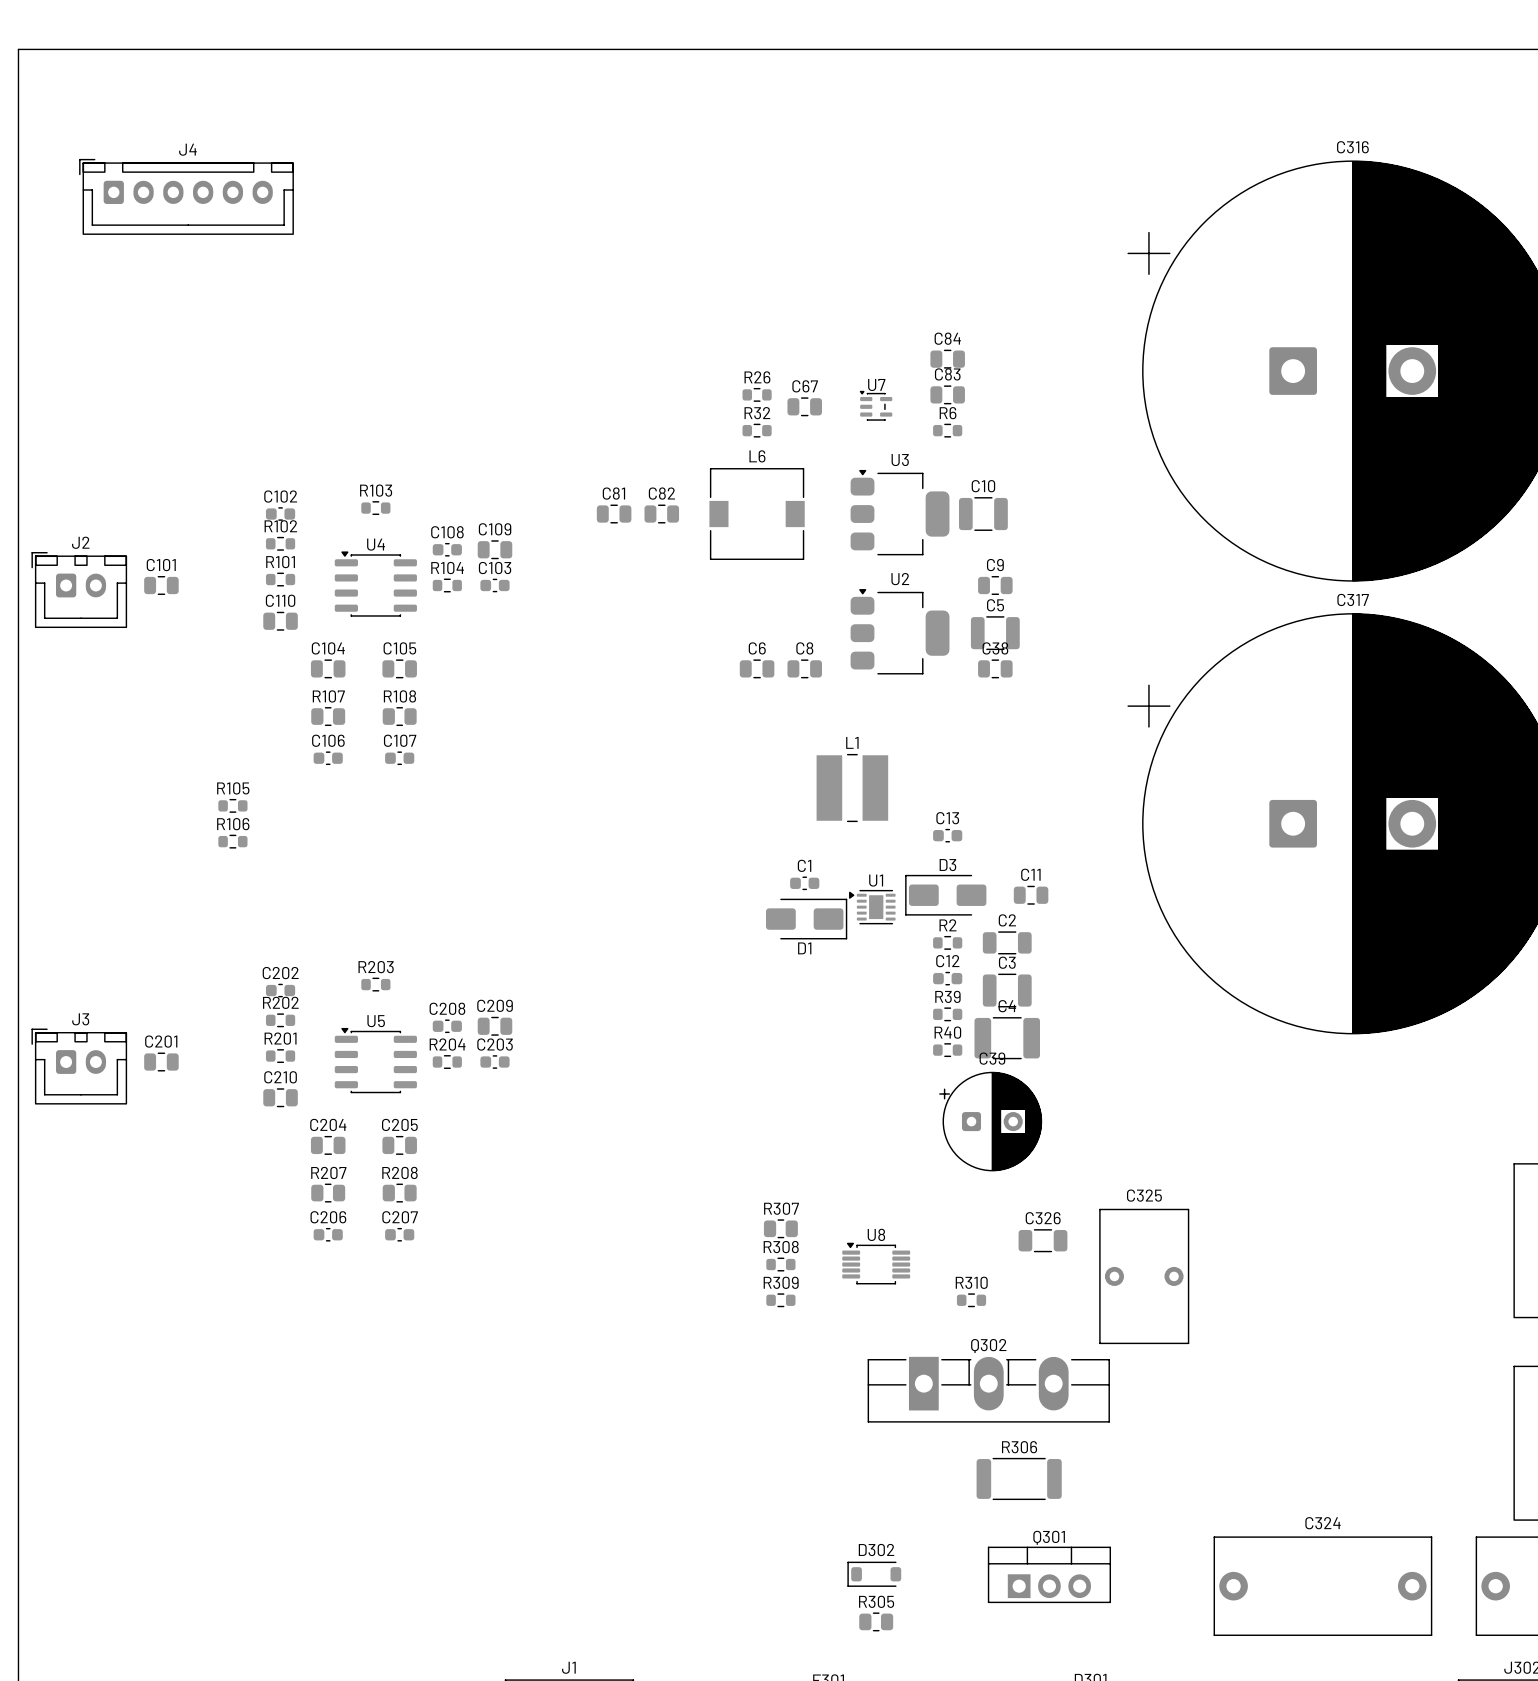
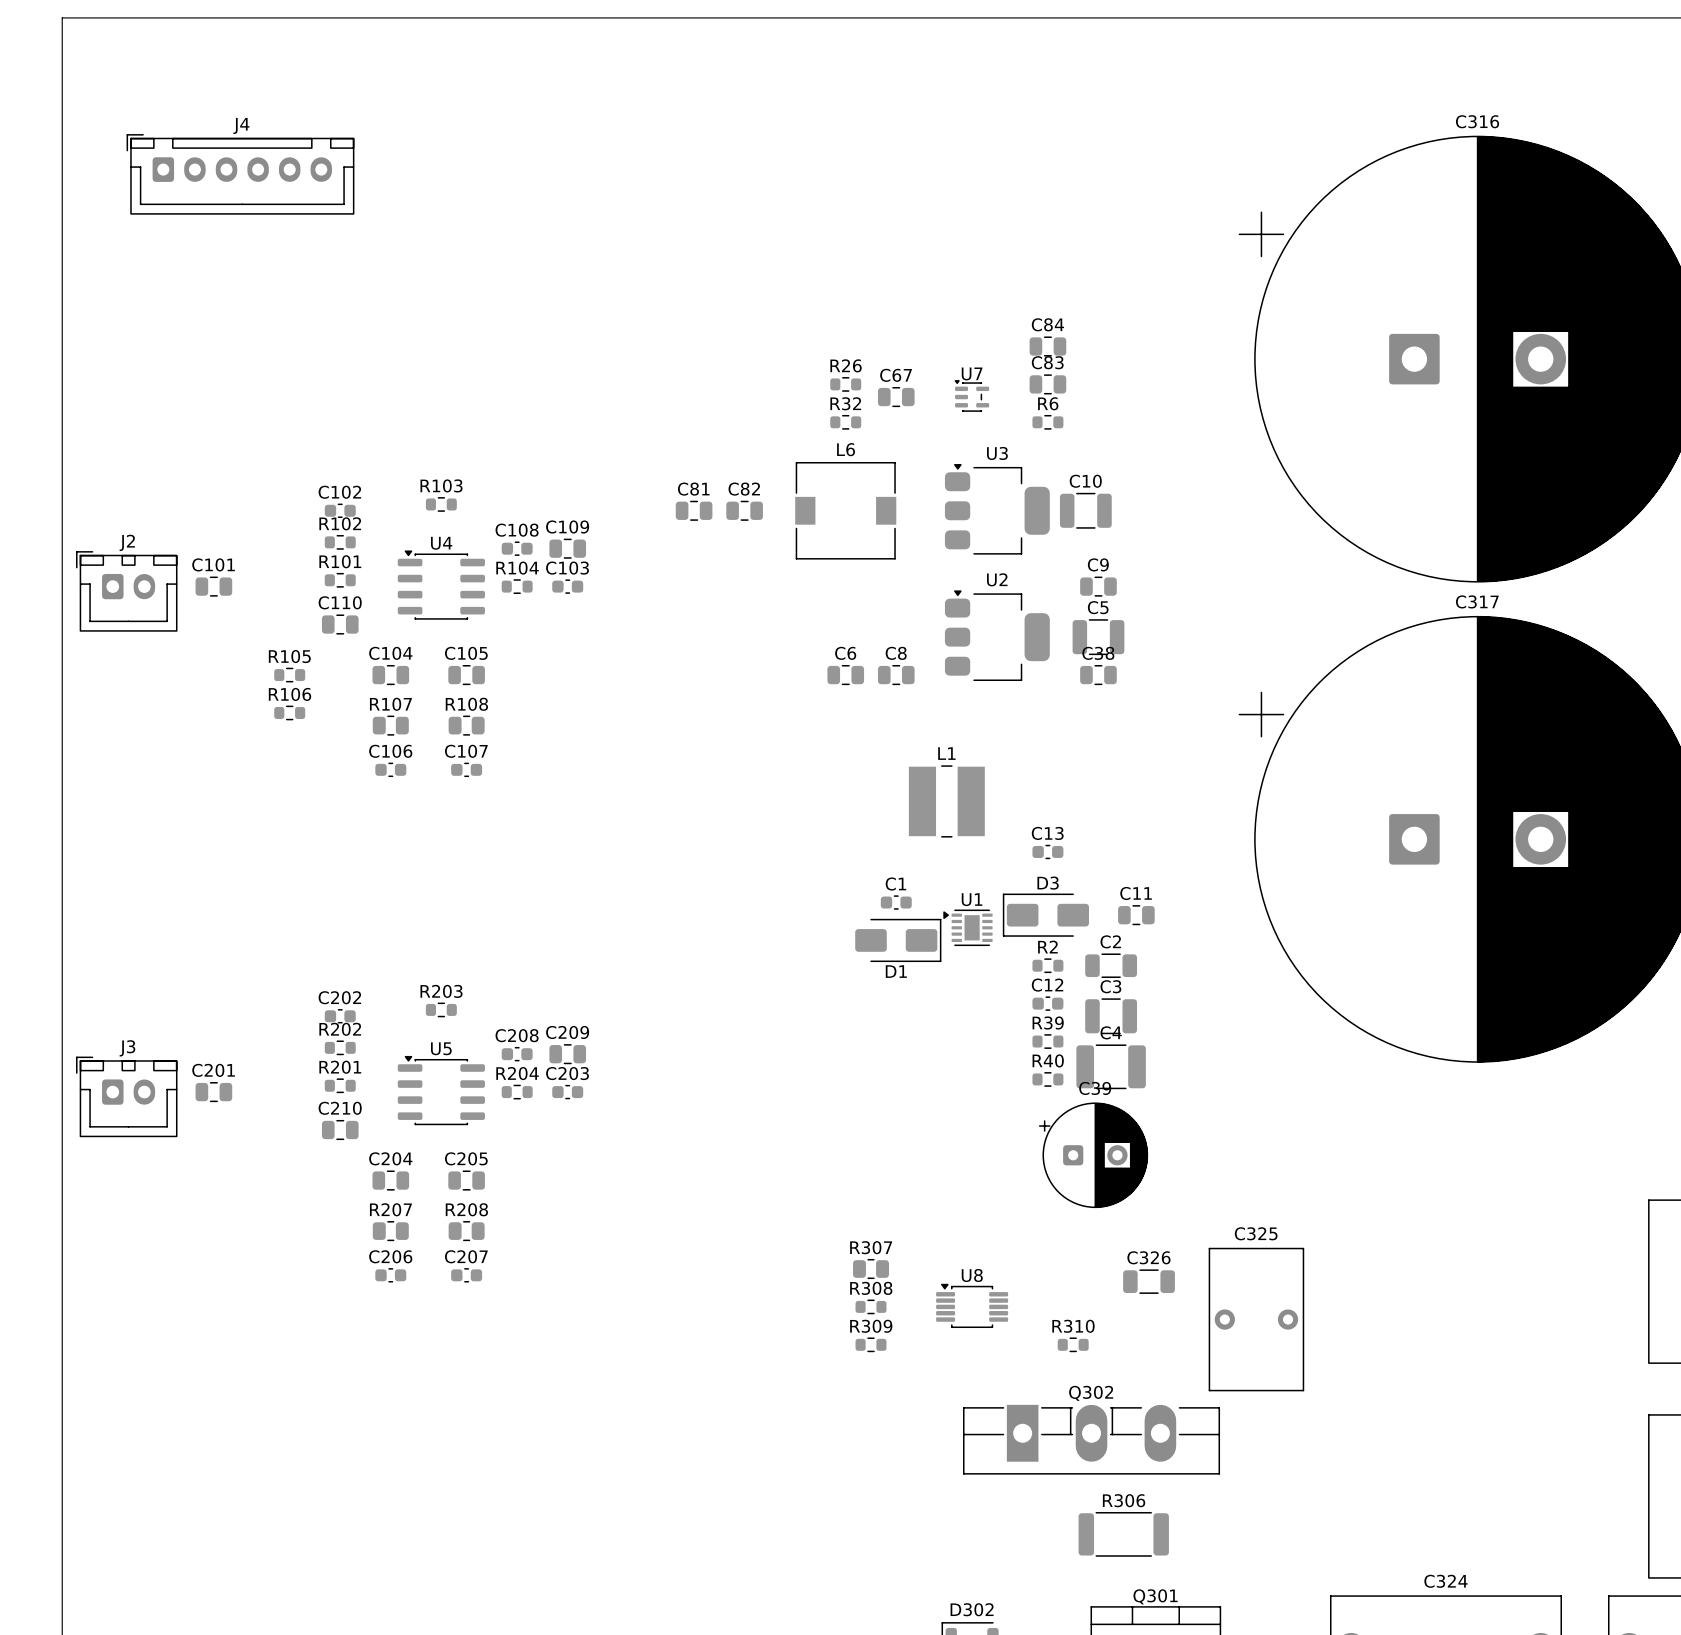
R105 position: (232, 805) -> (289, 675)
R106 position: (232, 841) -> (289, 712)

